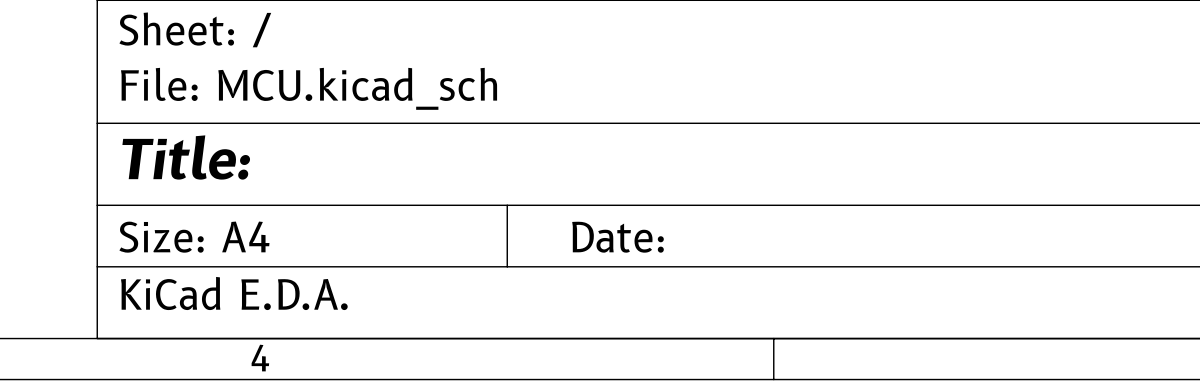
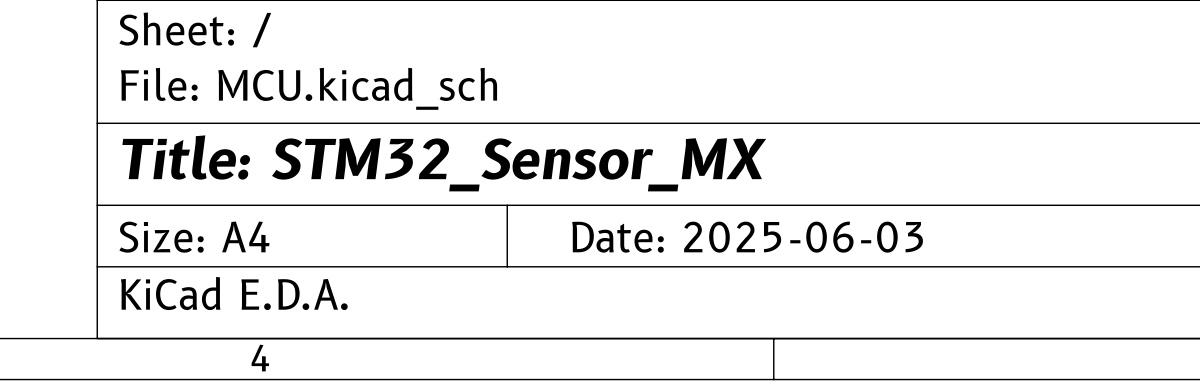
title block: Title: (186, 157) -> Title: STM32_Sensor_MX (444, 163)
title block: Date: (618, 237) -> Date: 2025-06-03 (747, 237)

